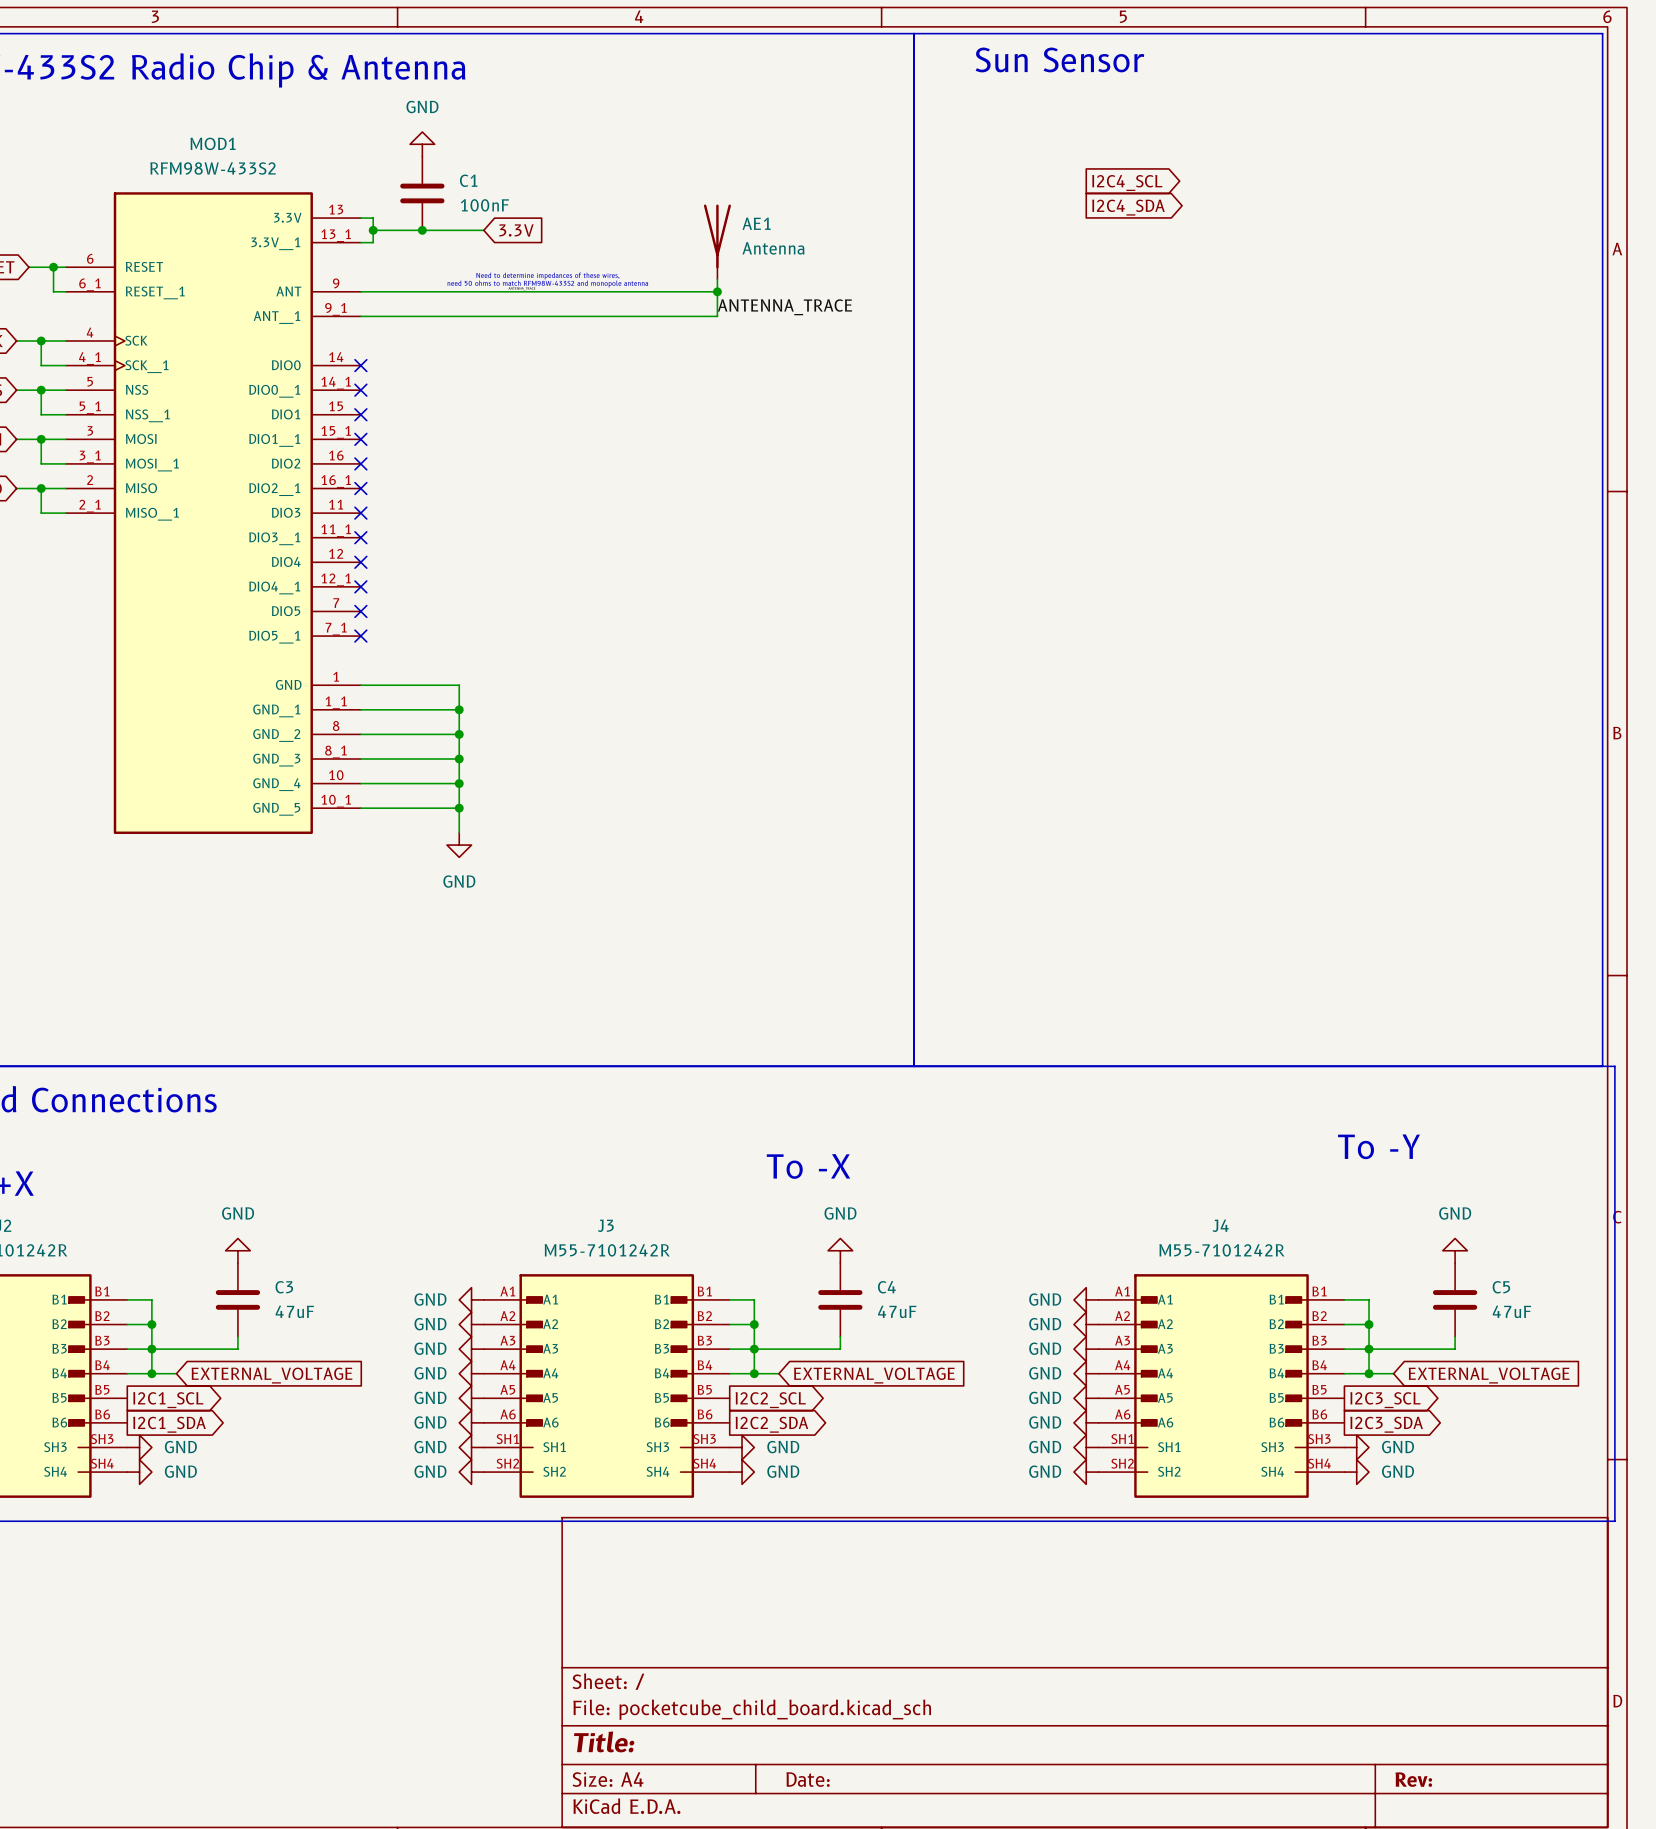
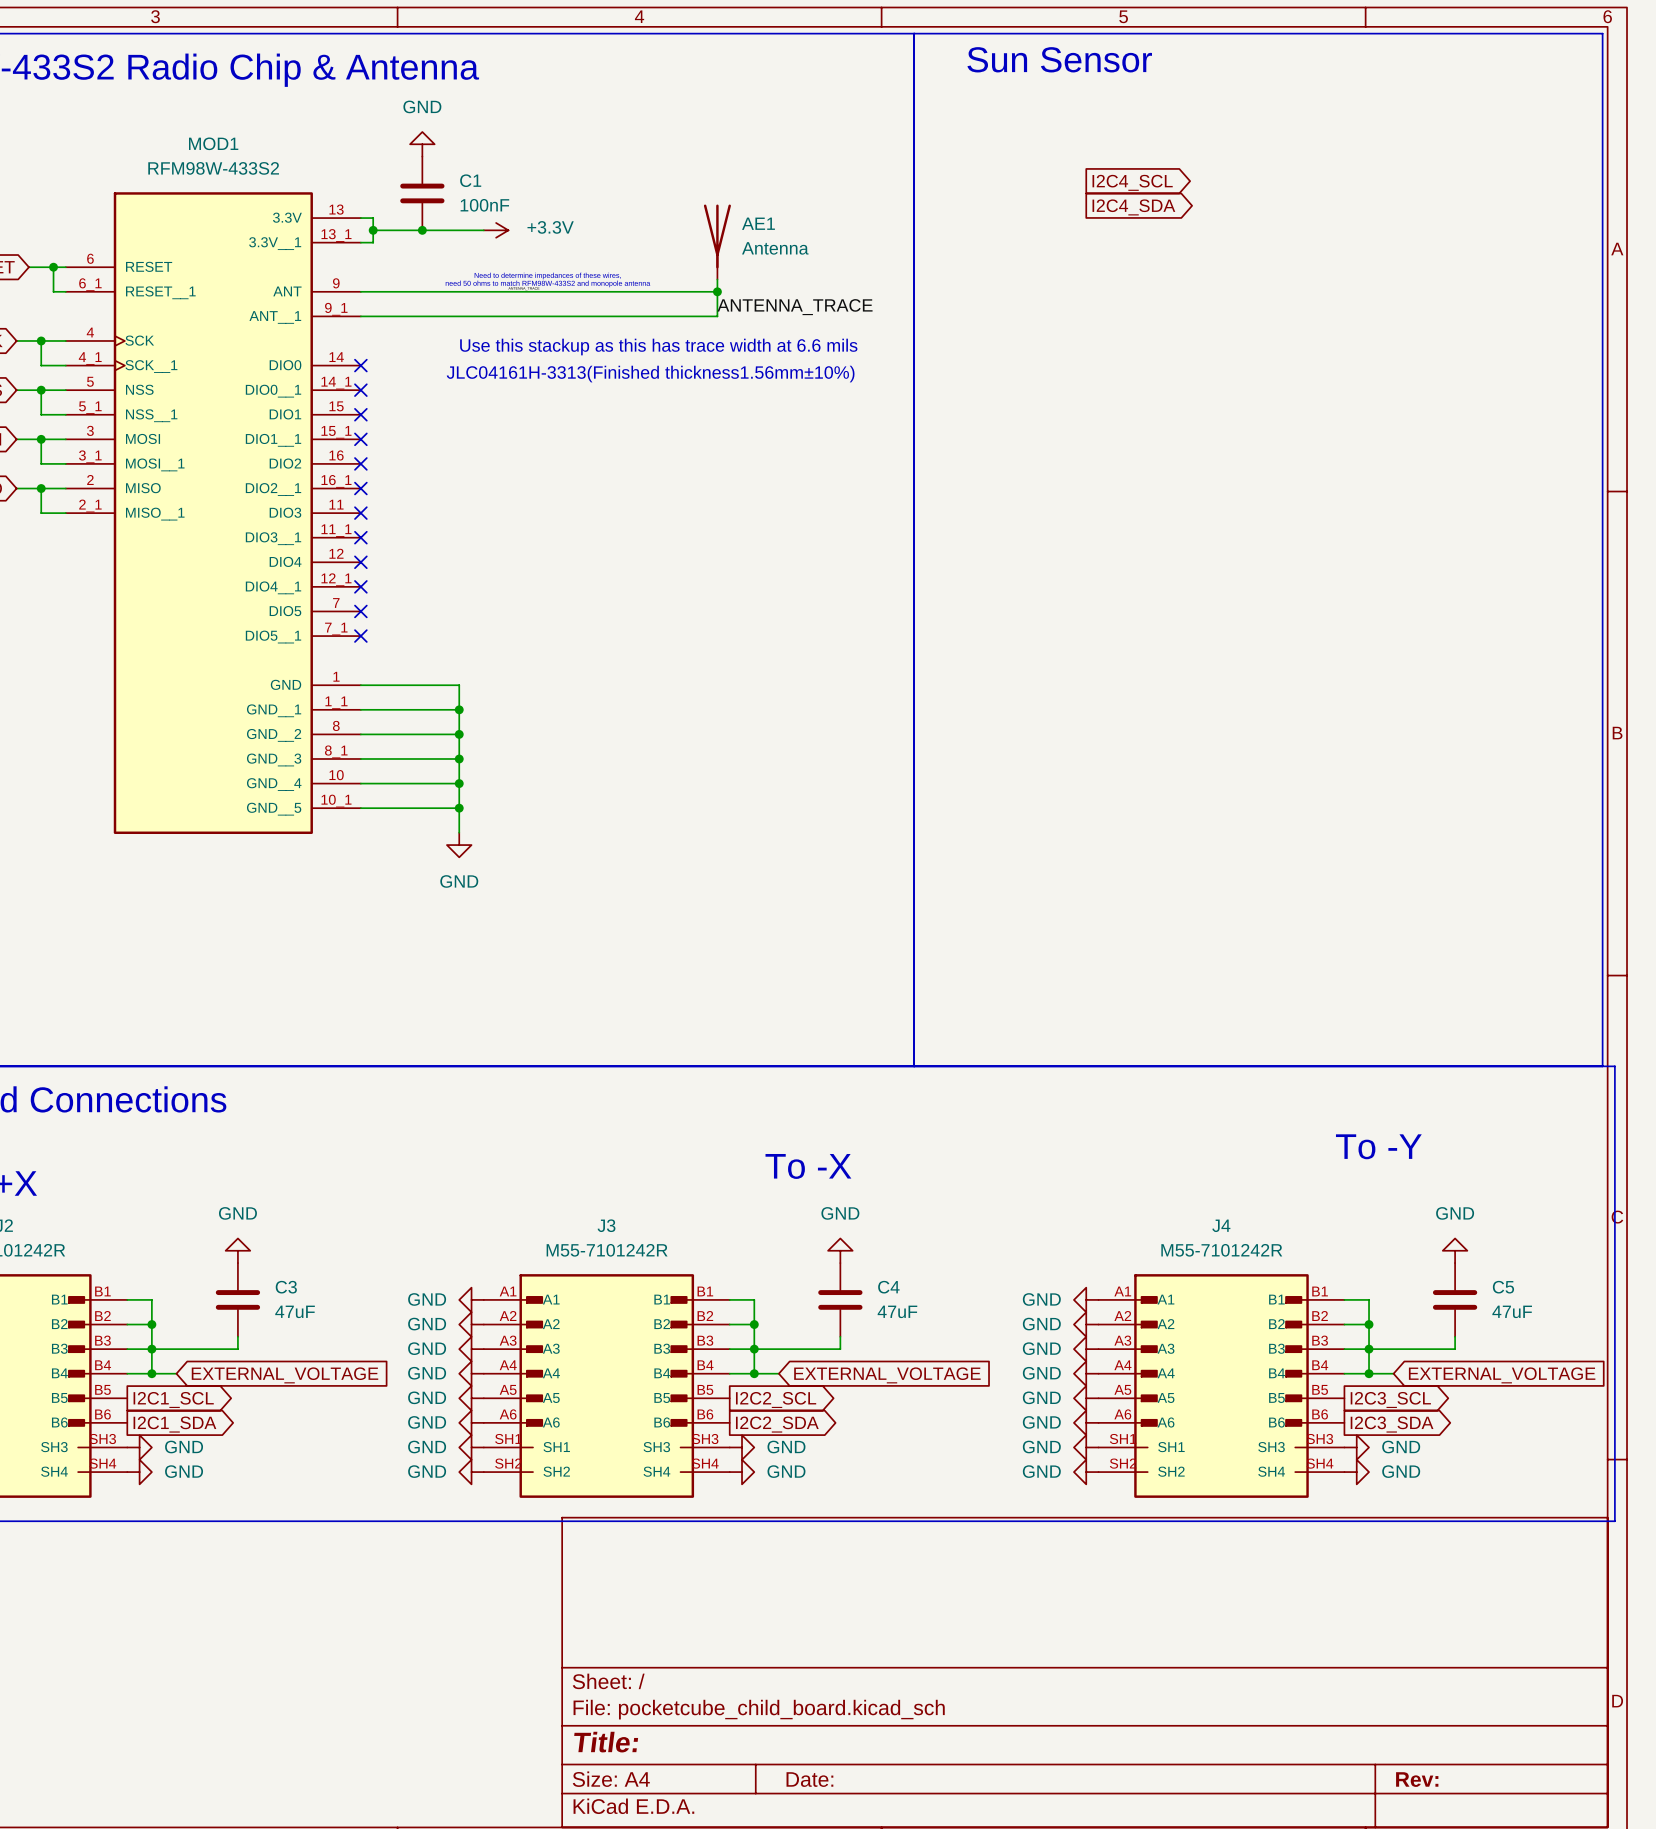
power symbol: none -> +3.3V (496, 230)
global label: 3.3V (516, 230) -> none
text: none -> Use this stackup as this has trace width at 6.6 mils (658, 347)
text: none -> JLC04161H-3313(Finished thickness1.56mm±10%) (650, 374)

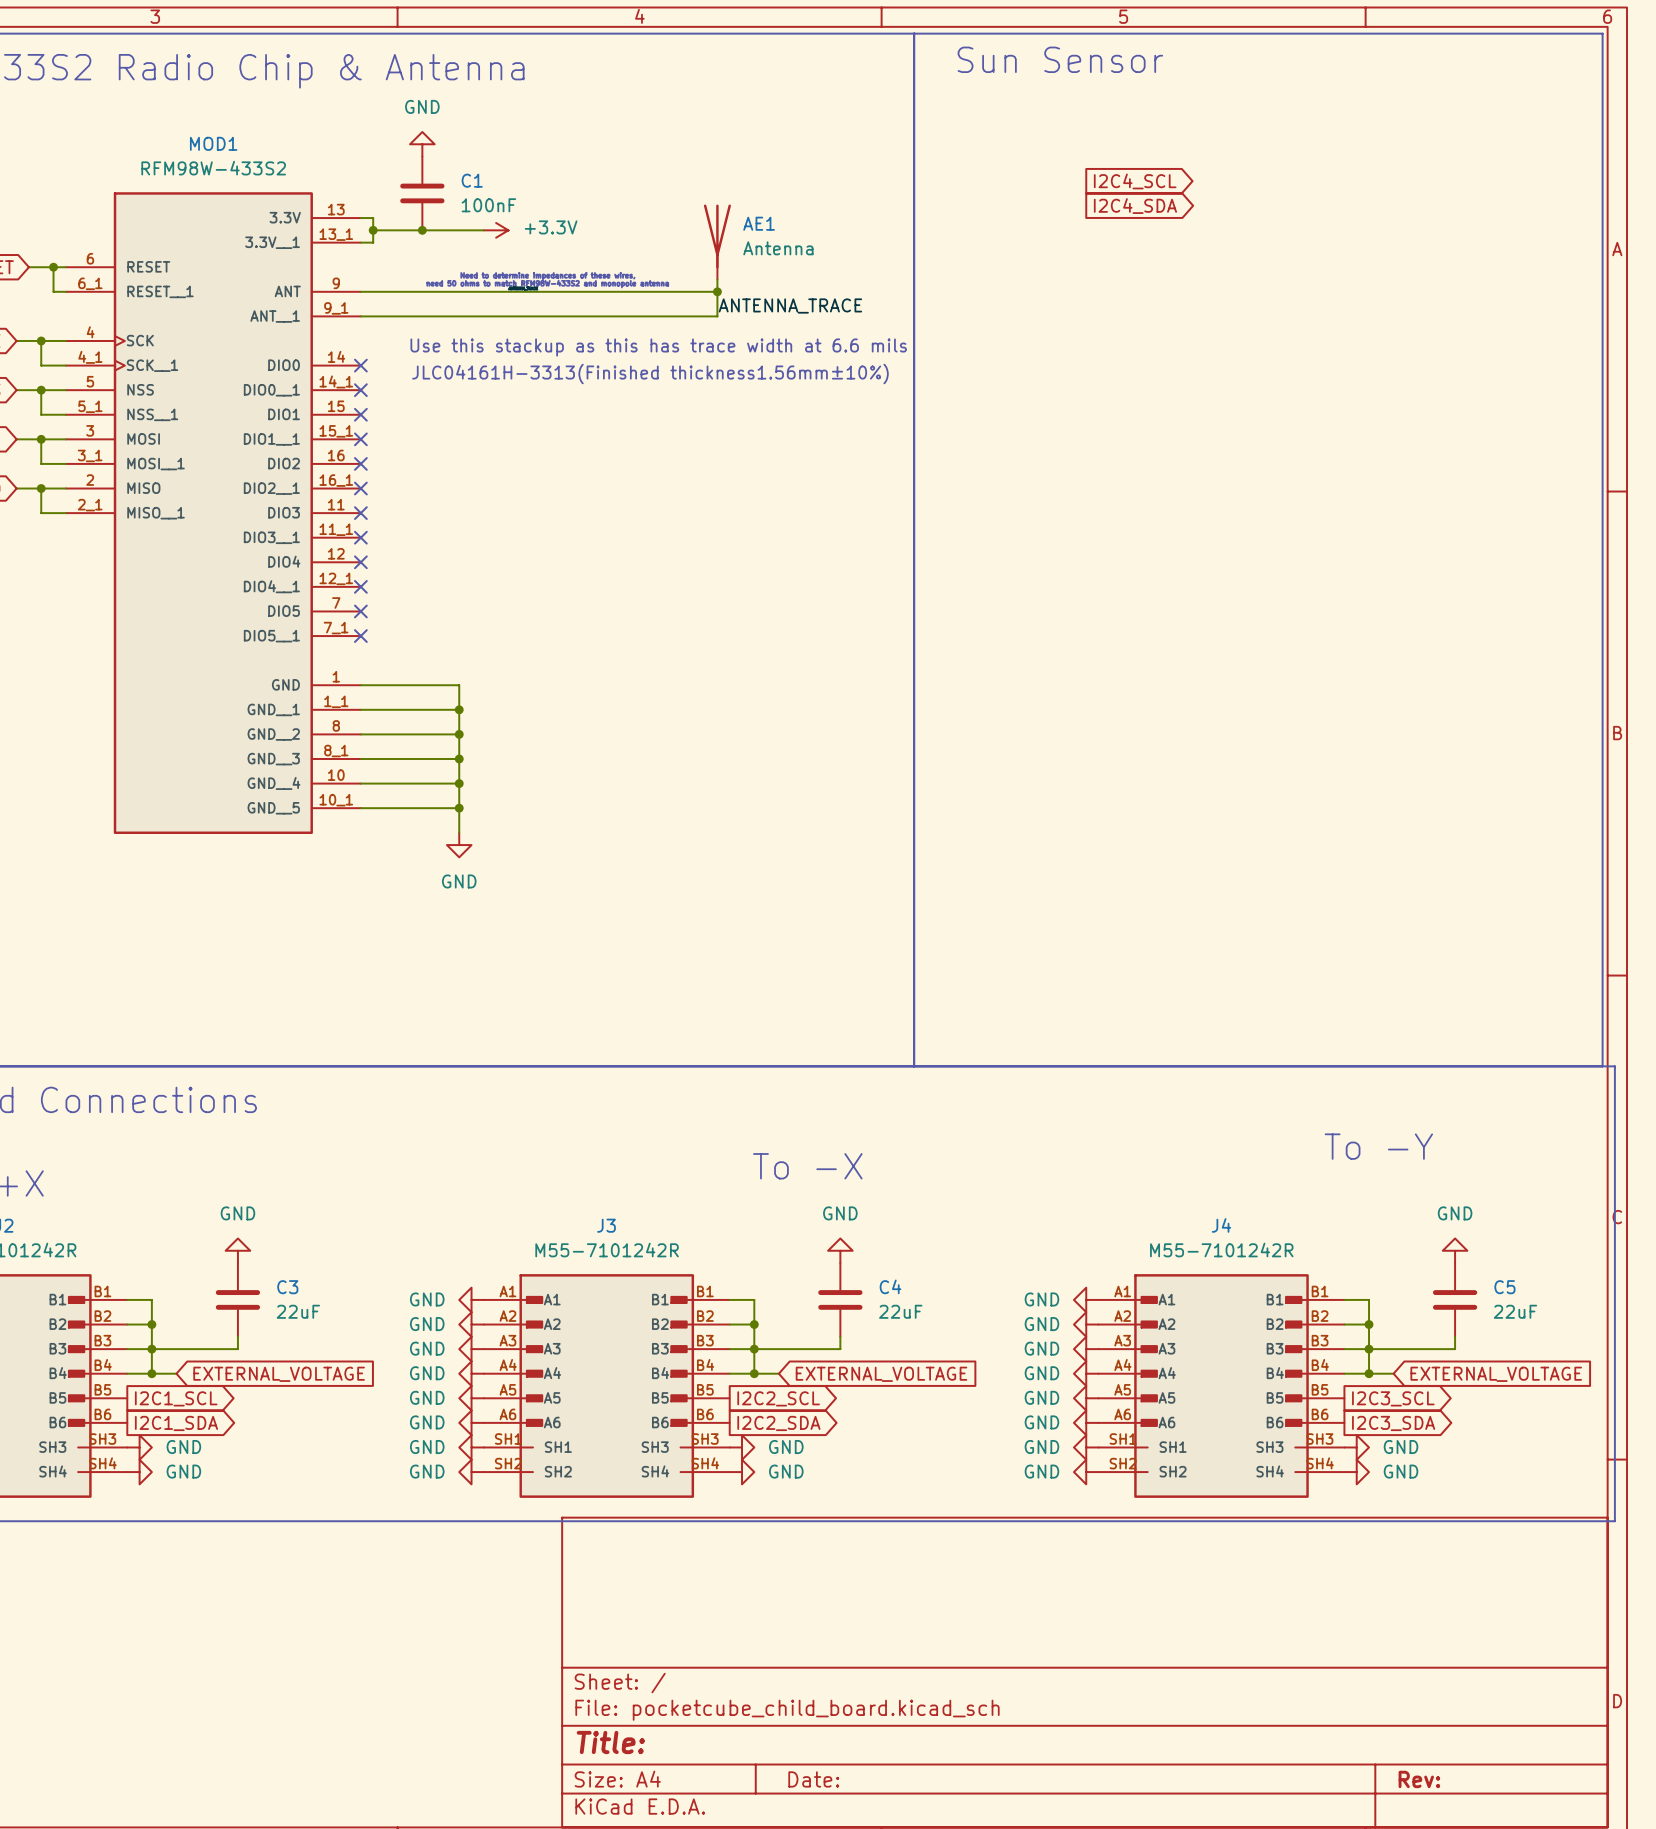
C3 value: 47uF (295, 1311) -> 22uF (298, 1311)
C4 value: 47uF (897, 1311) -> 22uF (900, 1311)
C5 value: 47uF (1512, 1311) -> 22uF (1515, 1311)

